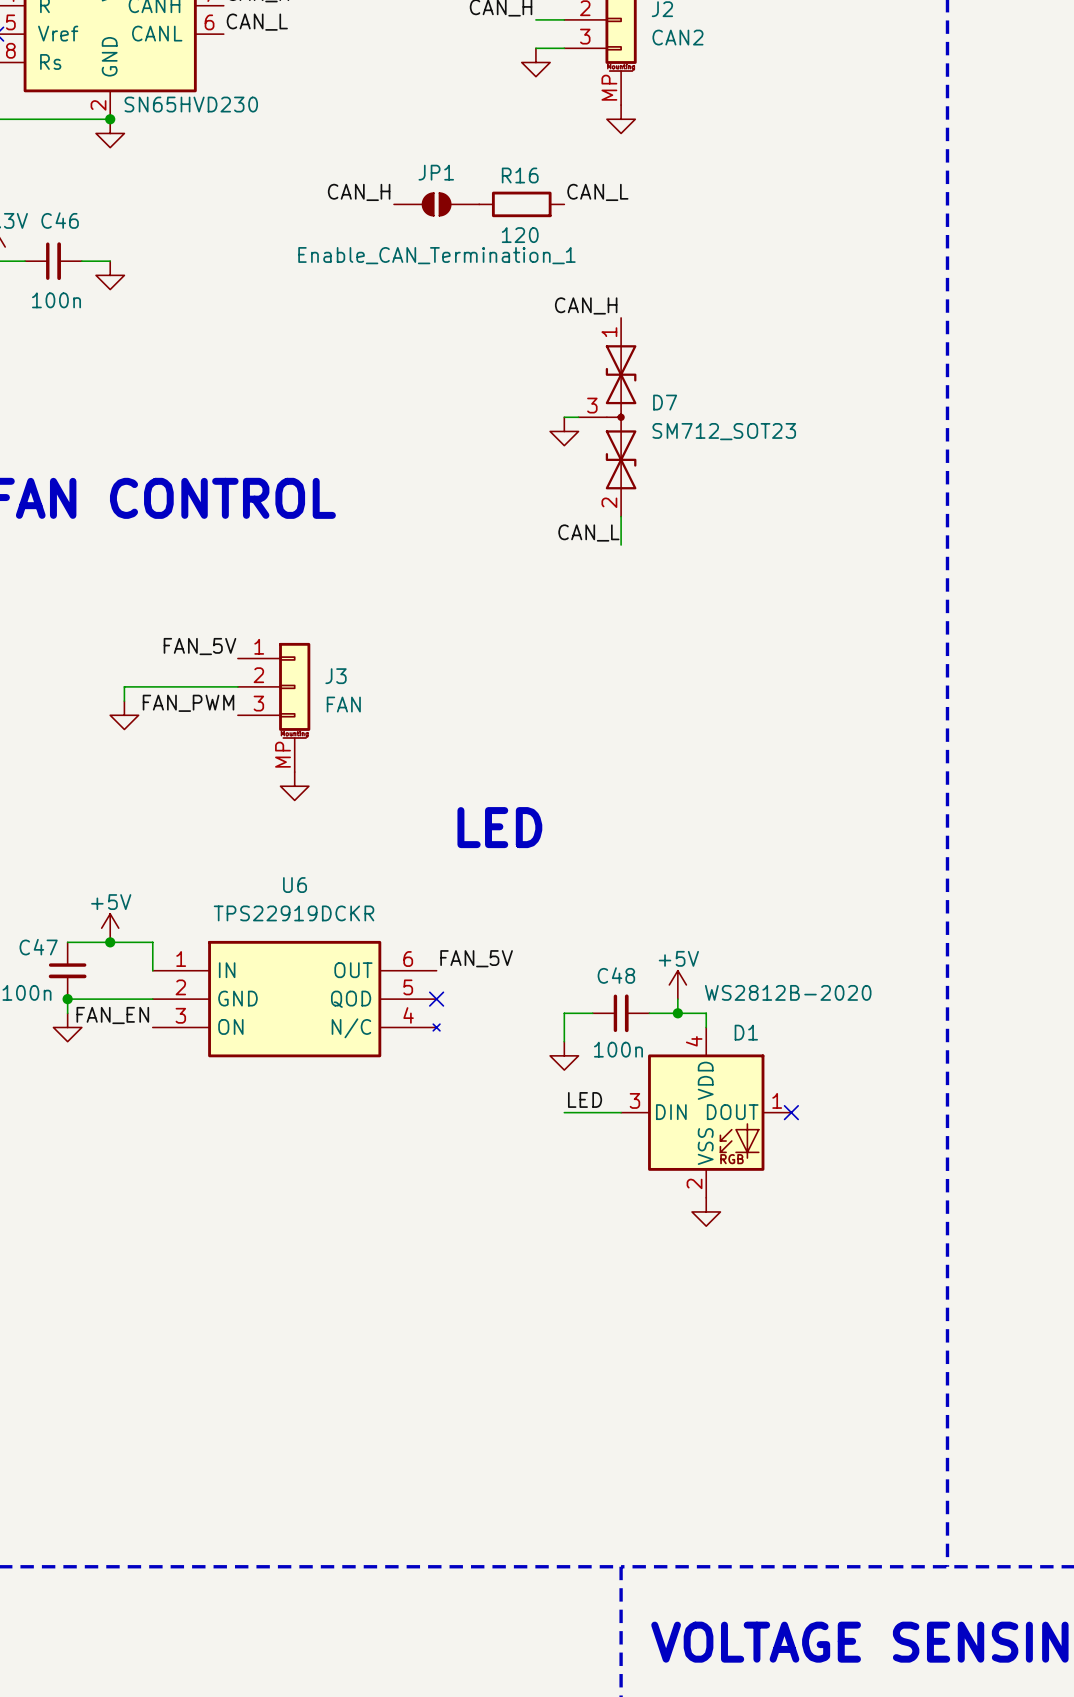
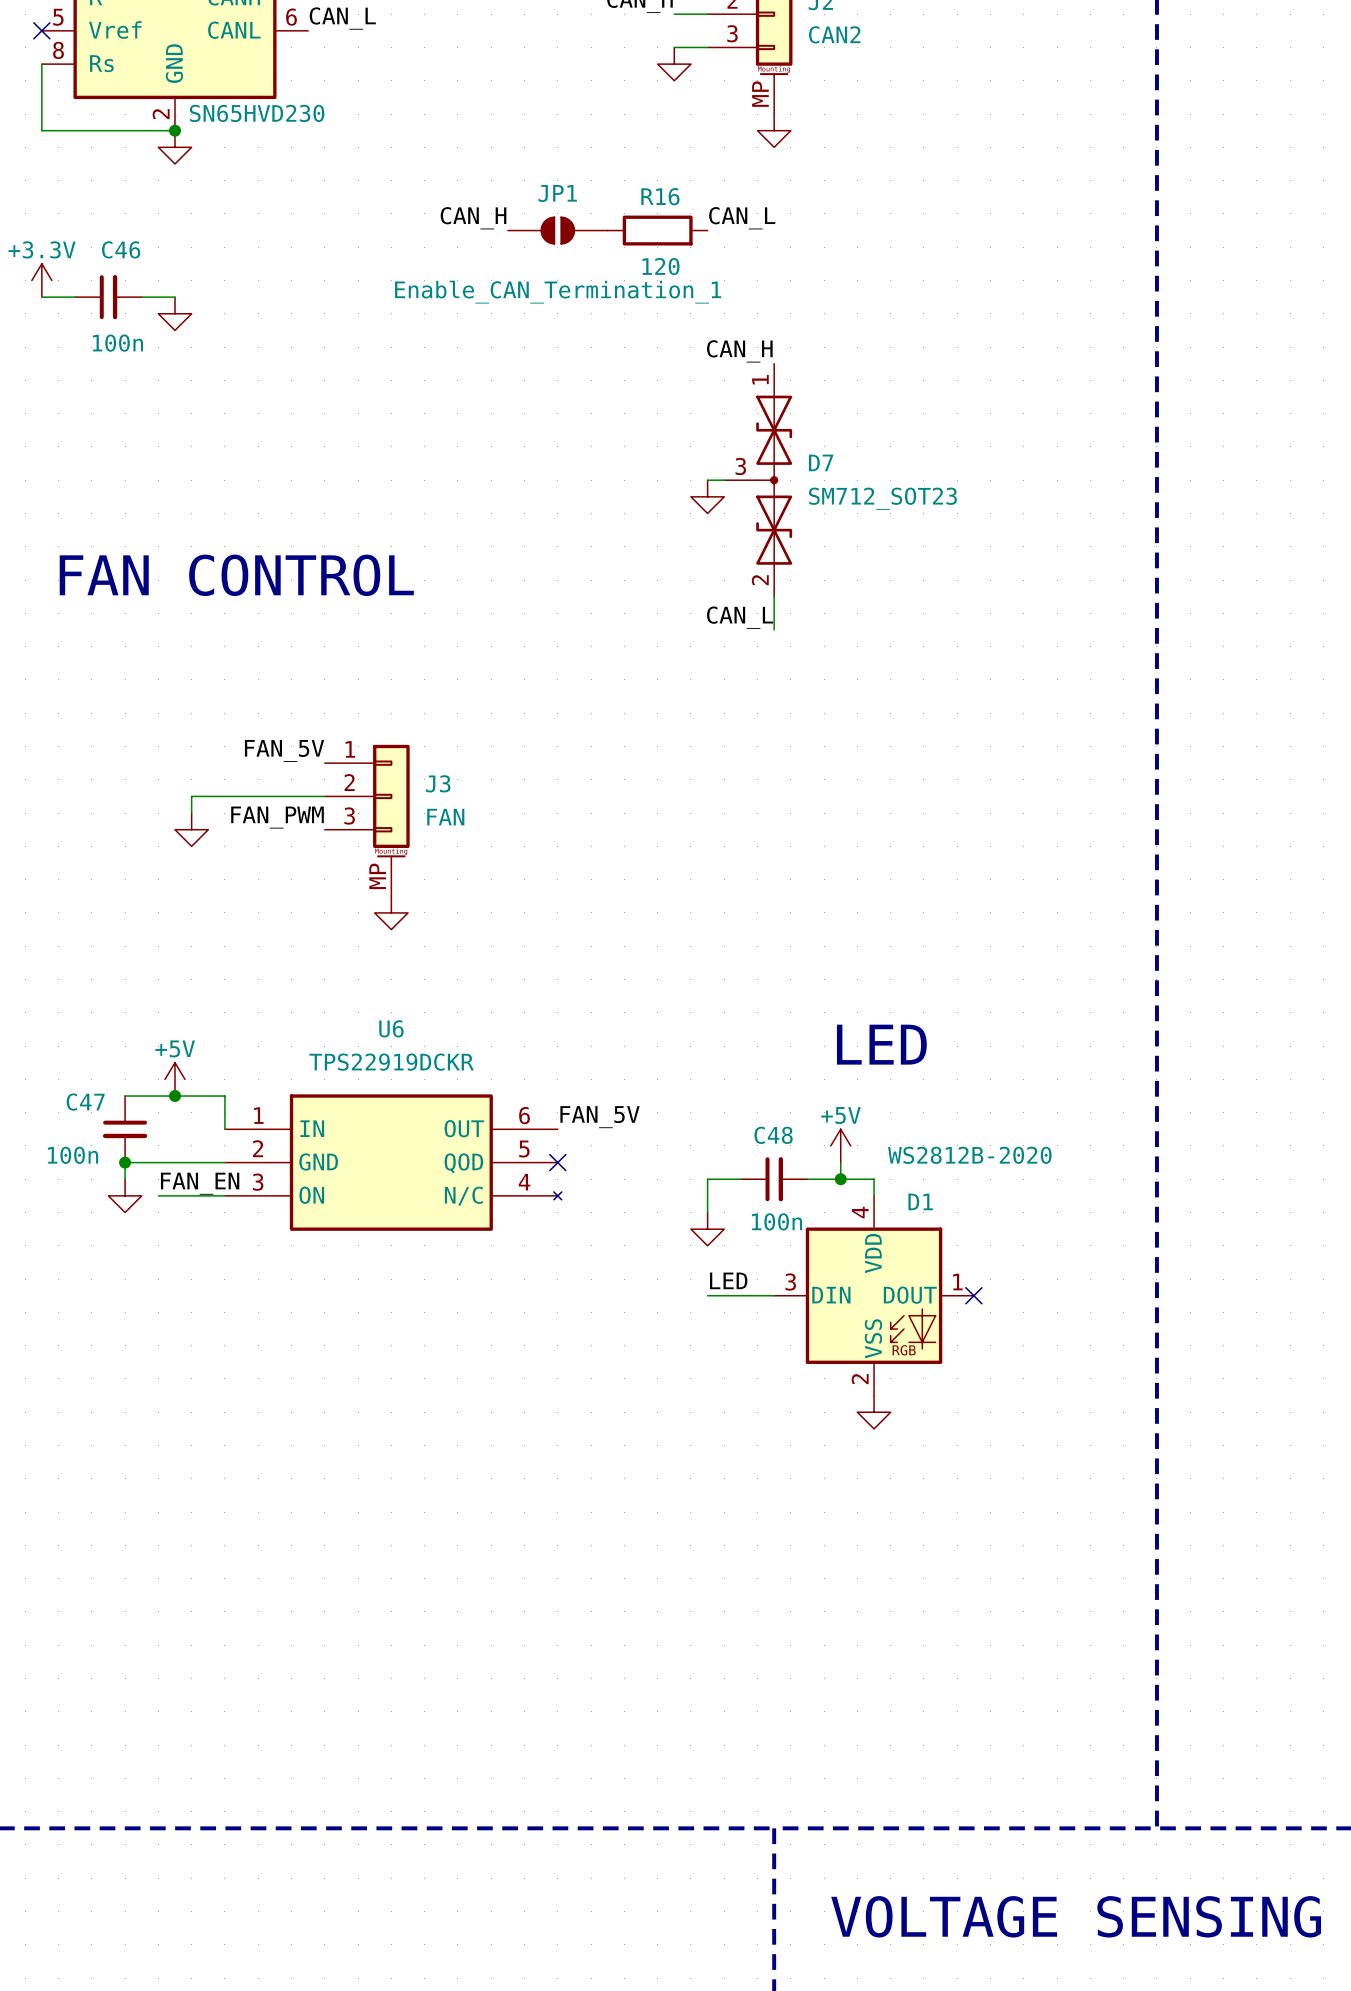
text position: LED (499, 827) -> LED (881, 1044)
label position: FAN_EN (112, 1015) -> FAN_EN (200, 1183)
wire: none -> (158, 1195) (224, 1195)

